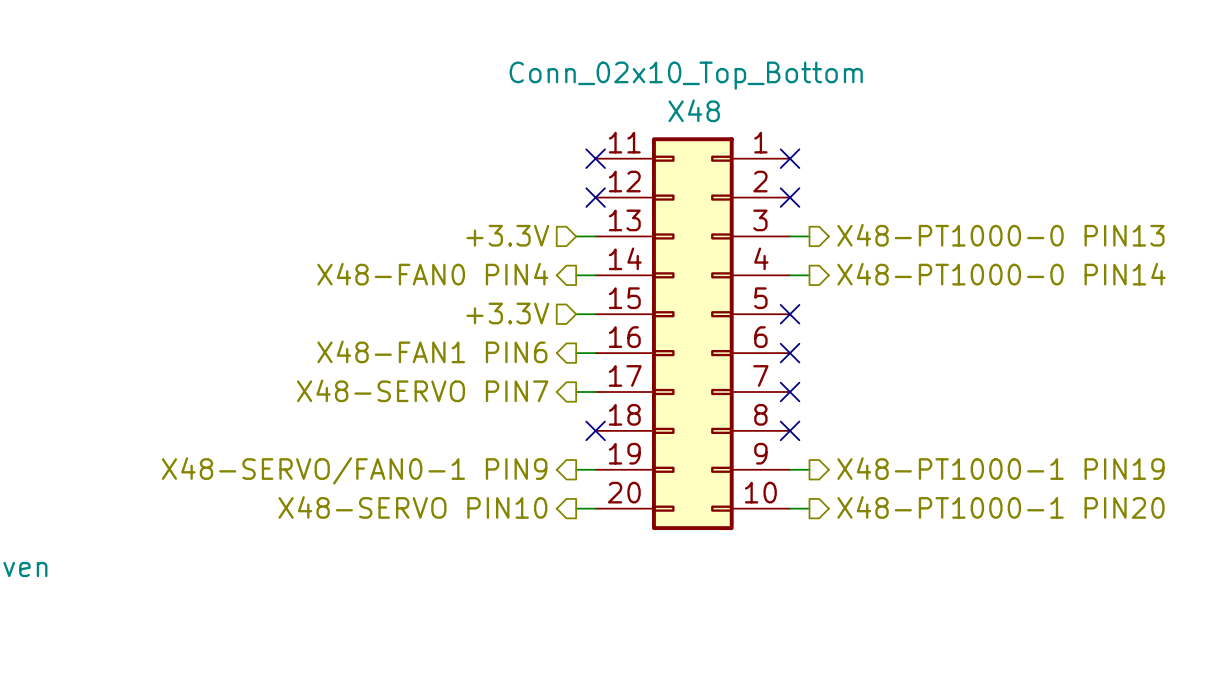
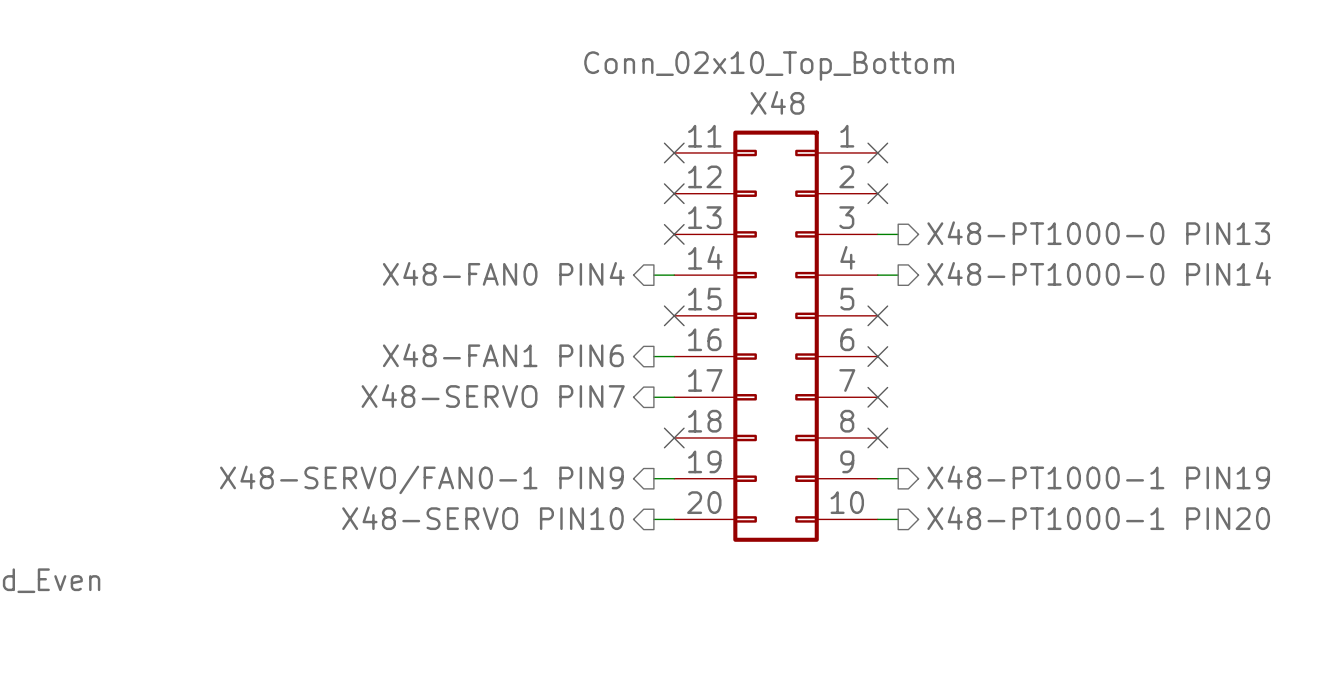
hierarchical label: +3.3V (507, 235) -> none
wire: (576, 236) (595, 236) -> none
no-connect mark: none -> (674, 234)
hierarchical label: +3.3V (507, 313) -> none
wire: (576, 314) (595, 314) -> none
no-connect mark: none -> (674, 315)

